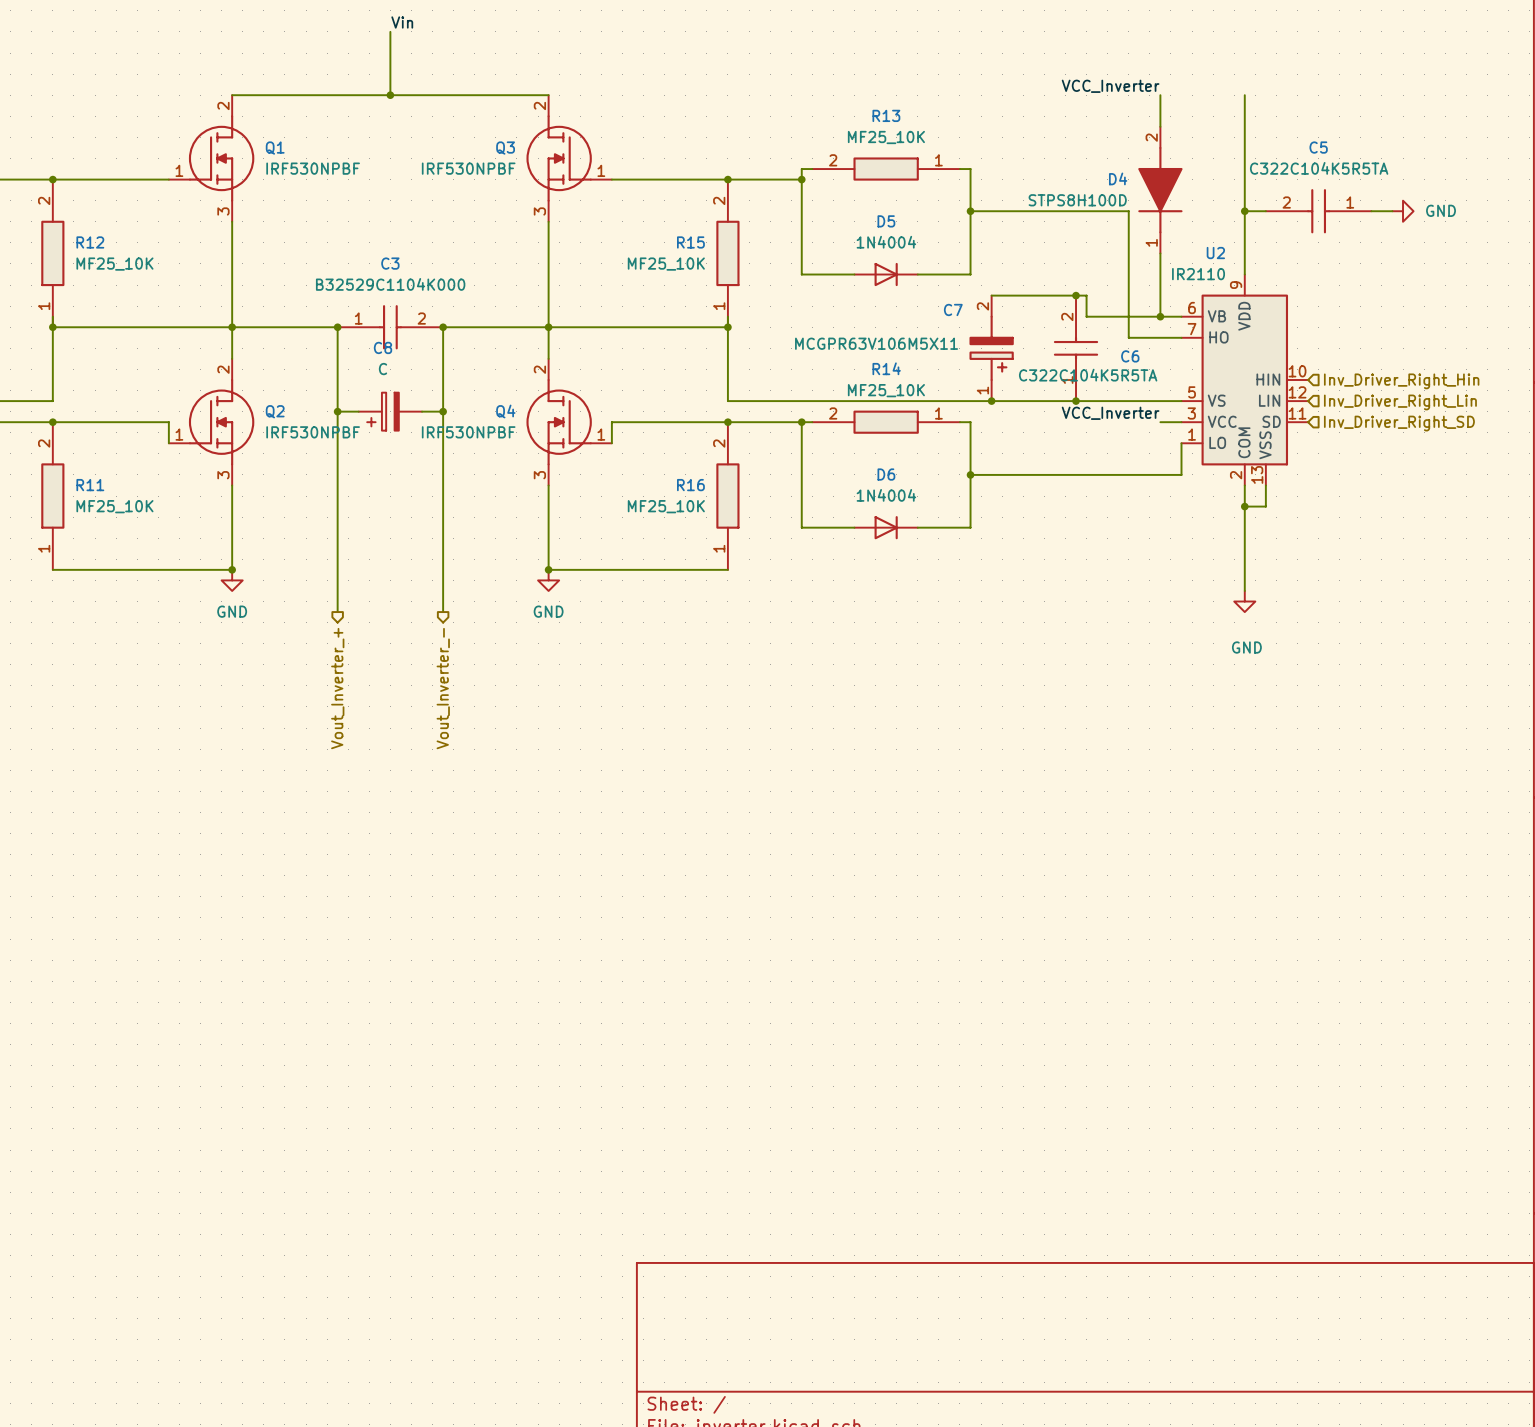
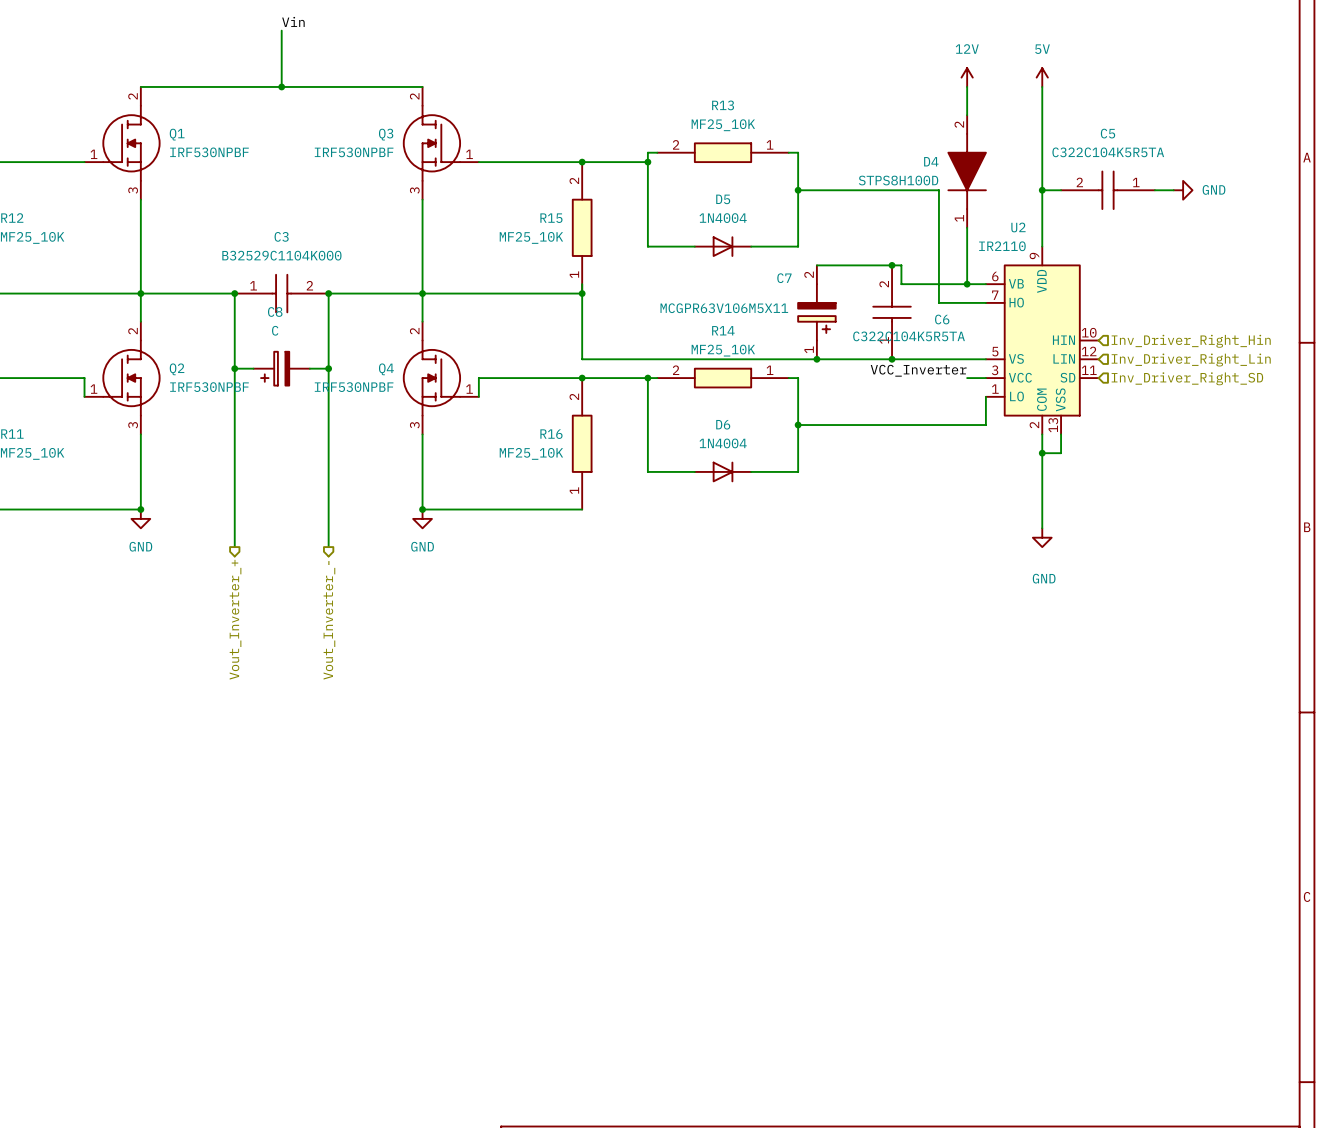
power symbol: none -> 12V (967, 77)
power symbol: none -> 5V (1042, 77)
label: VCC_Inverter (1110, 86) -> none

